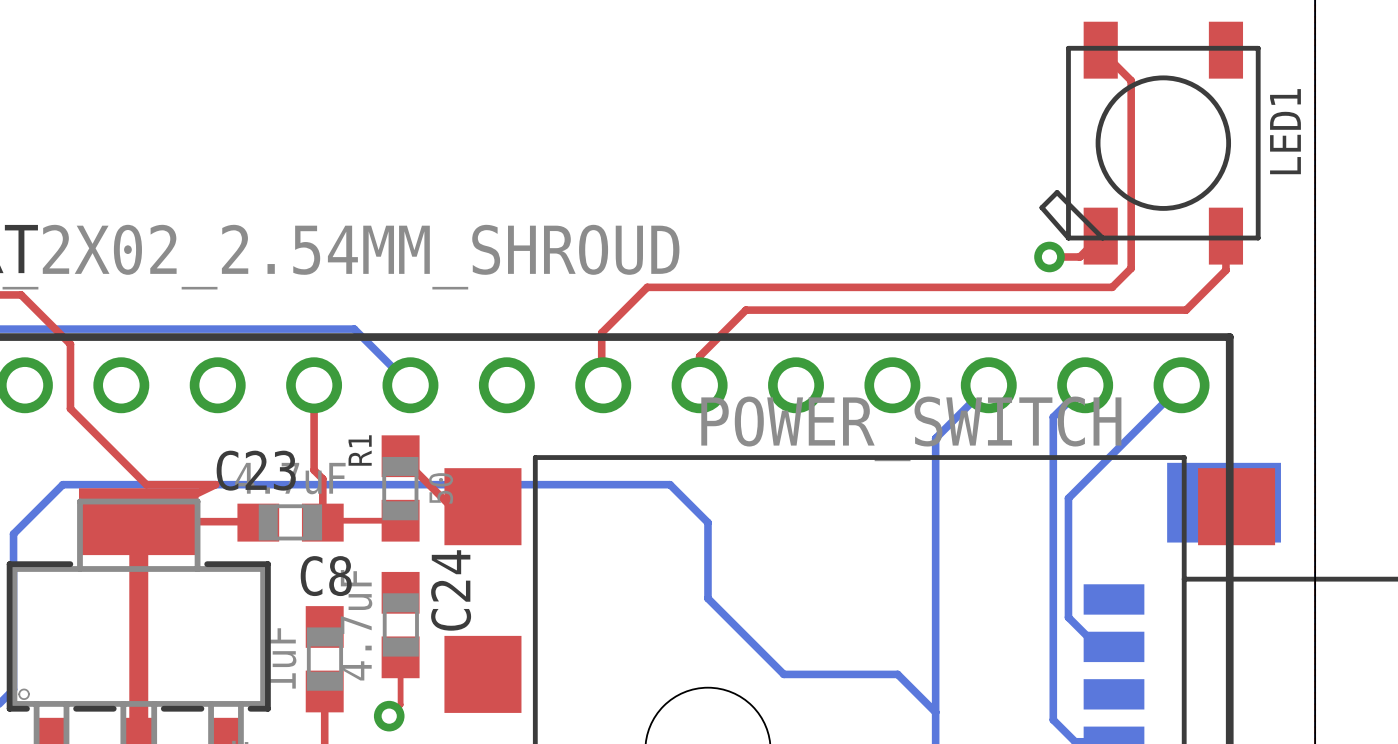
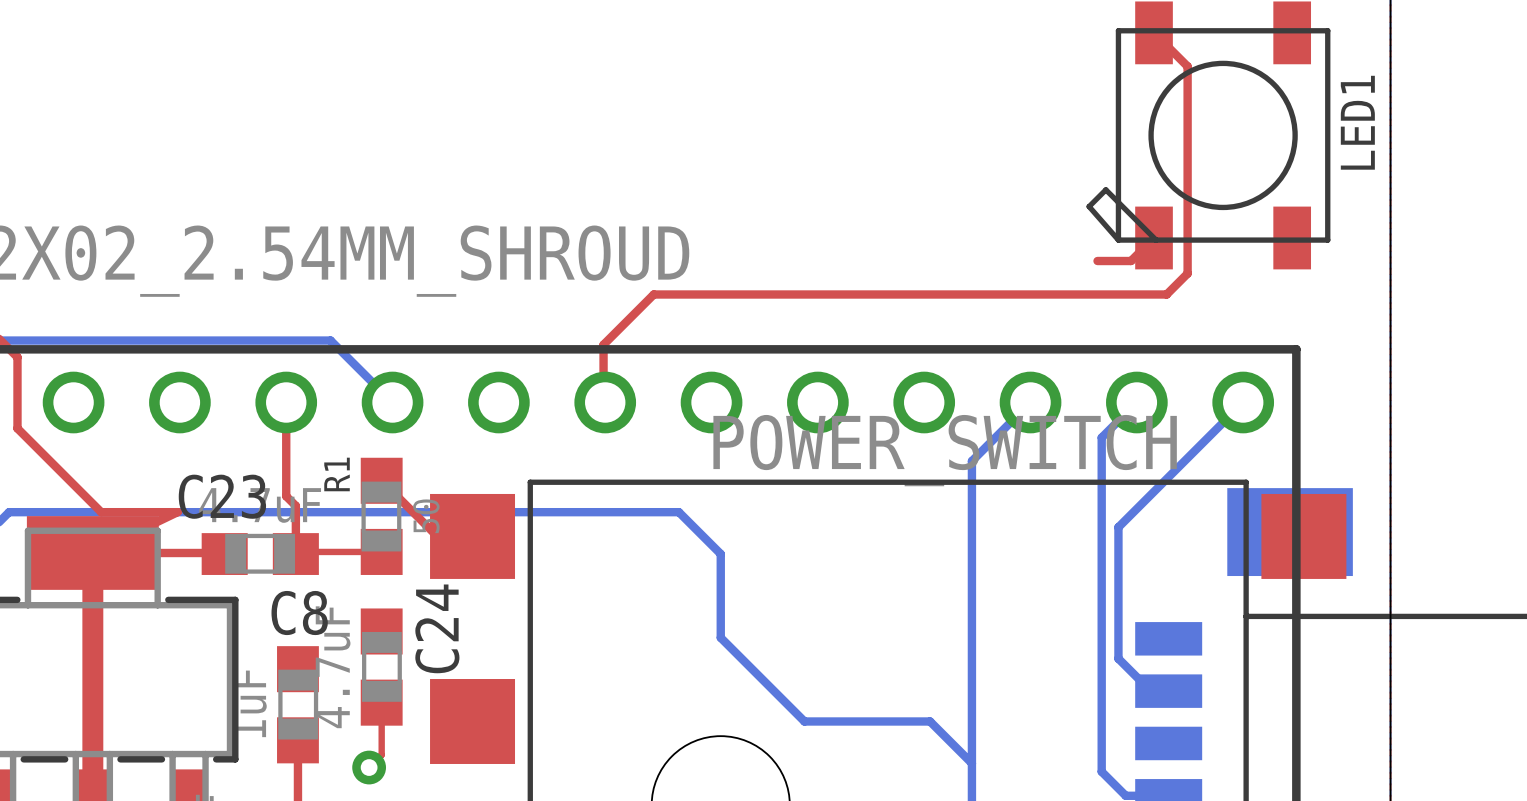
top track: (1225, 236) (1225, 270) (1186, 310) (745, 310) (699, 356) (699, 385) -> none
via: (1049, 256) -> none

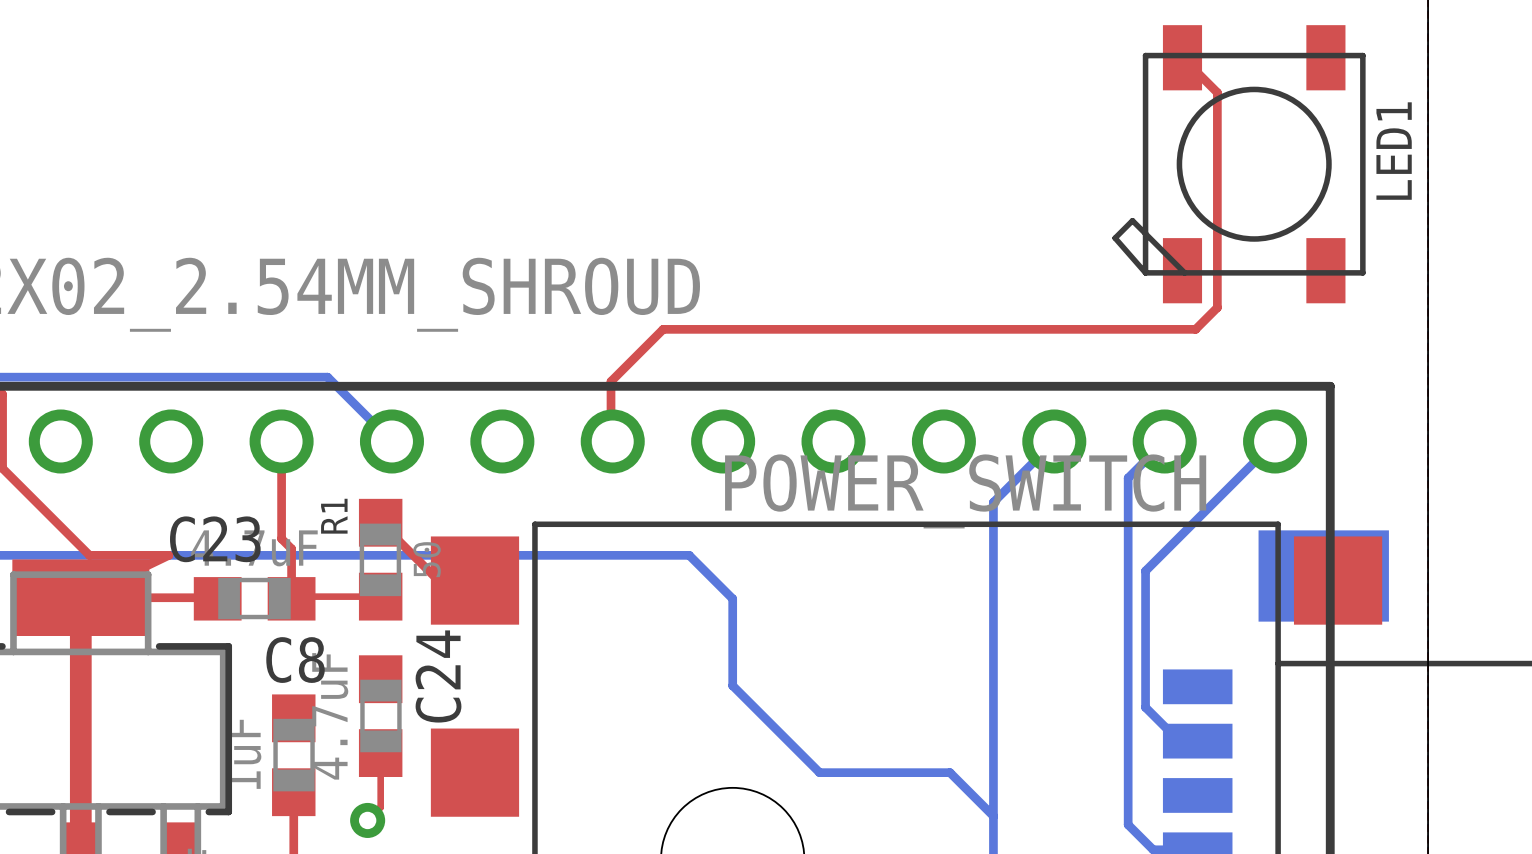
top track: (1154, 237) (1131, 261) (1097, 261) -> none

